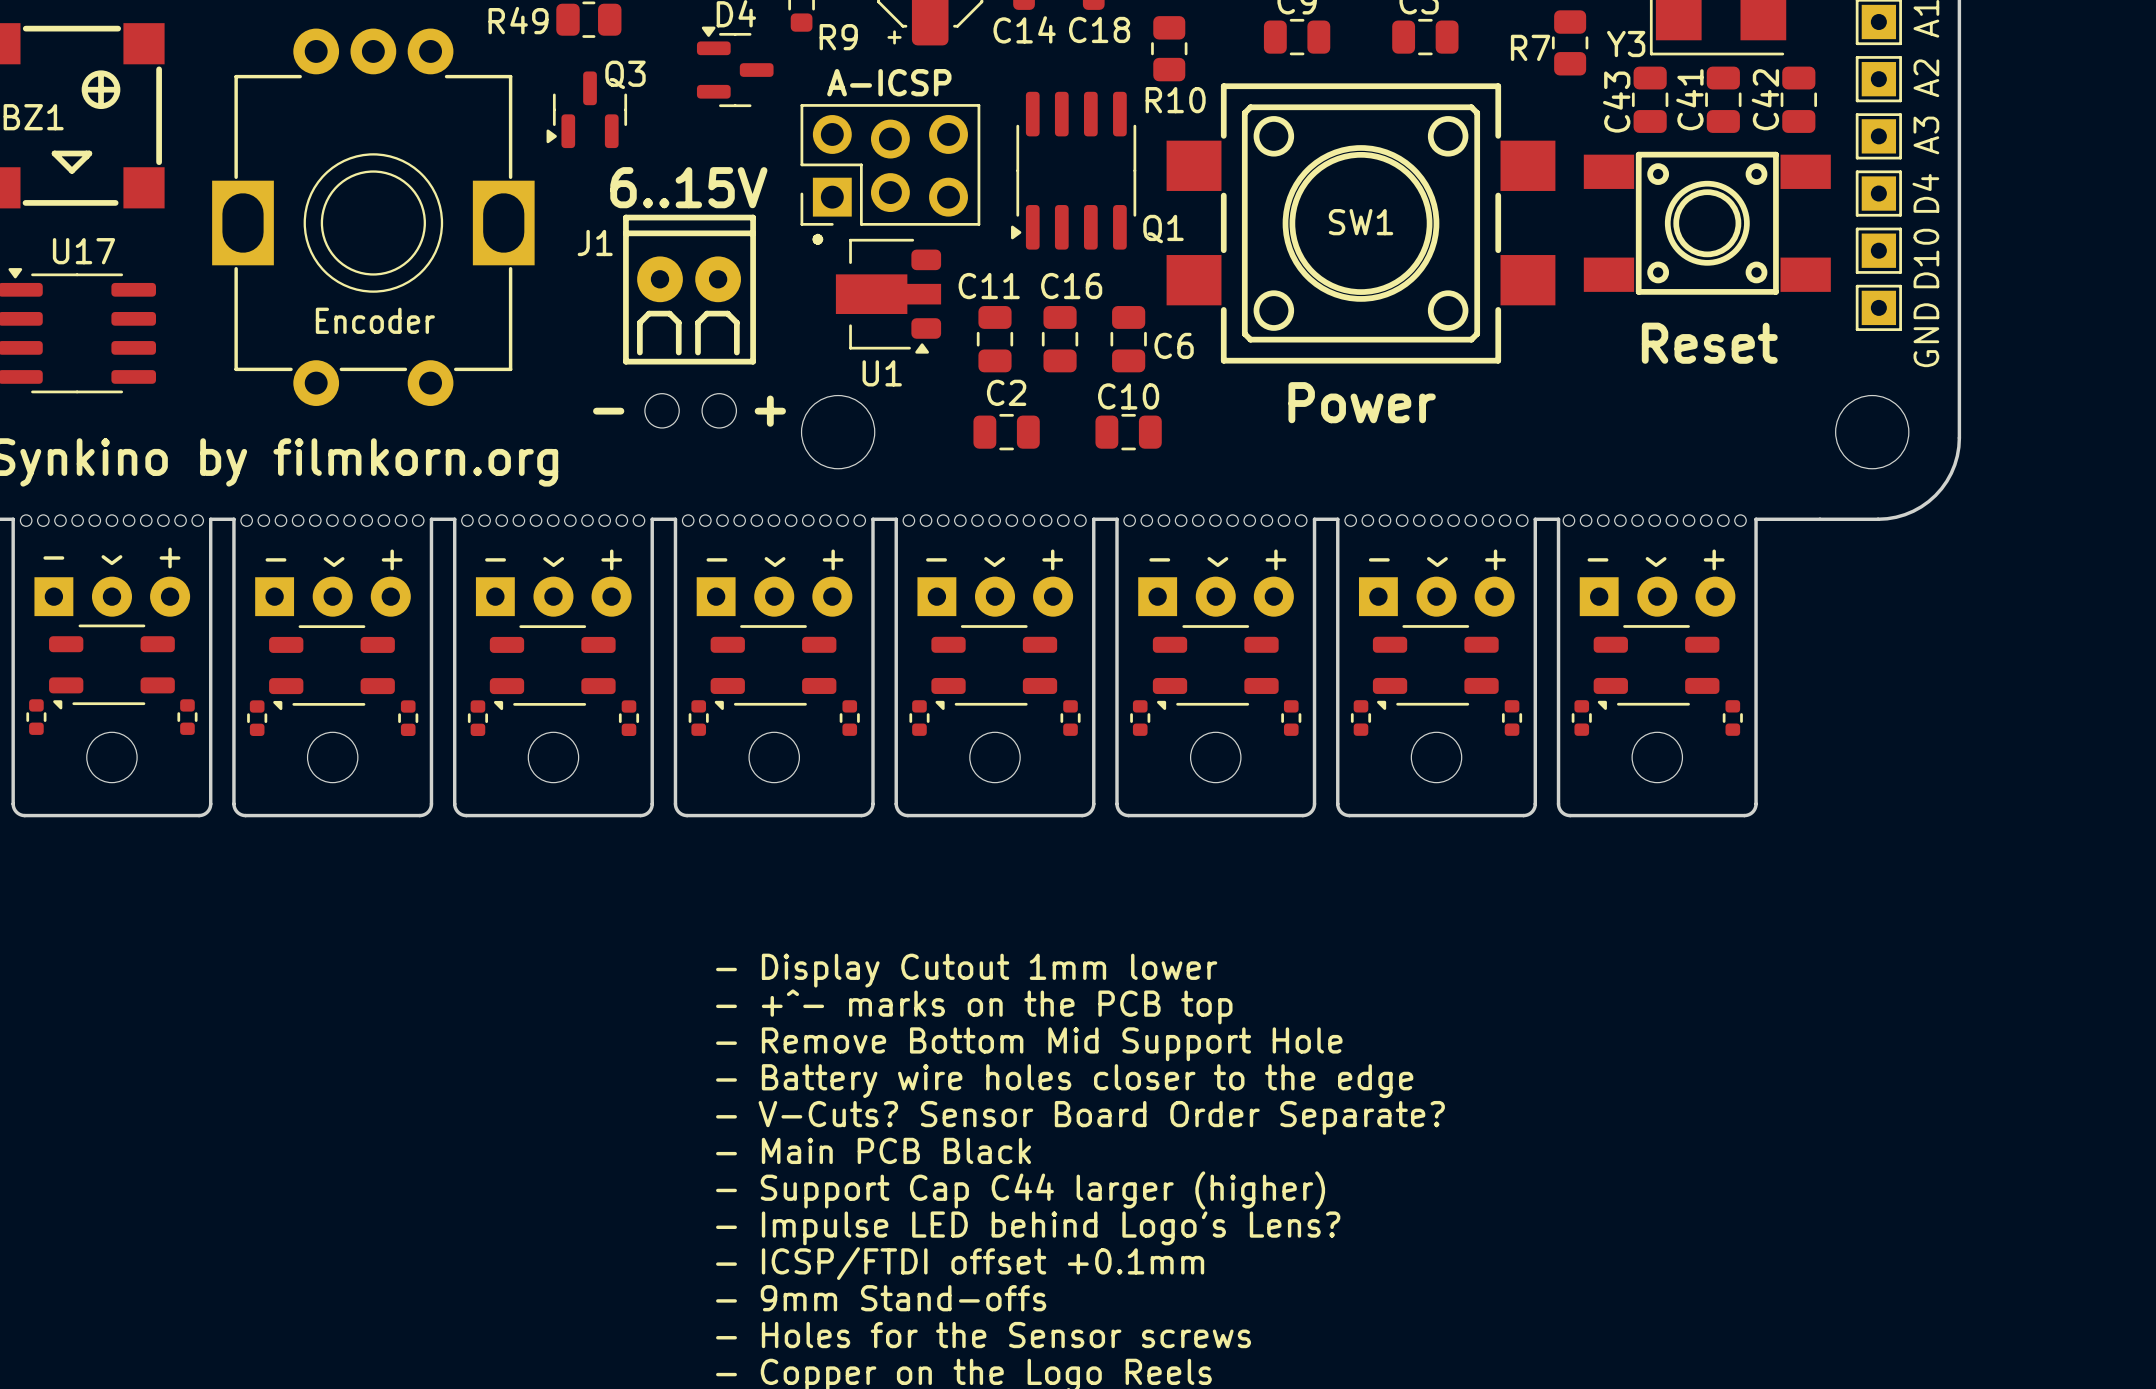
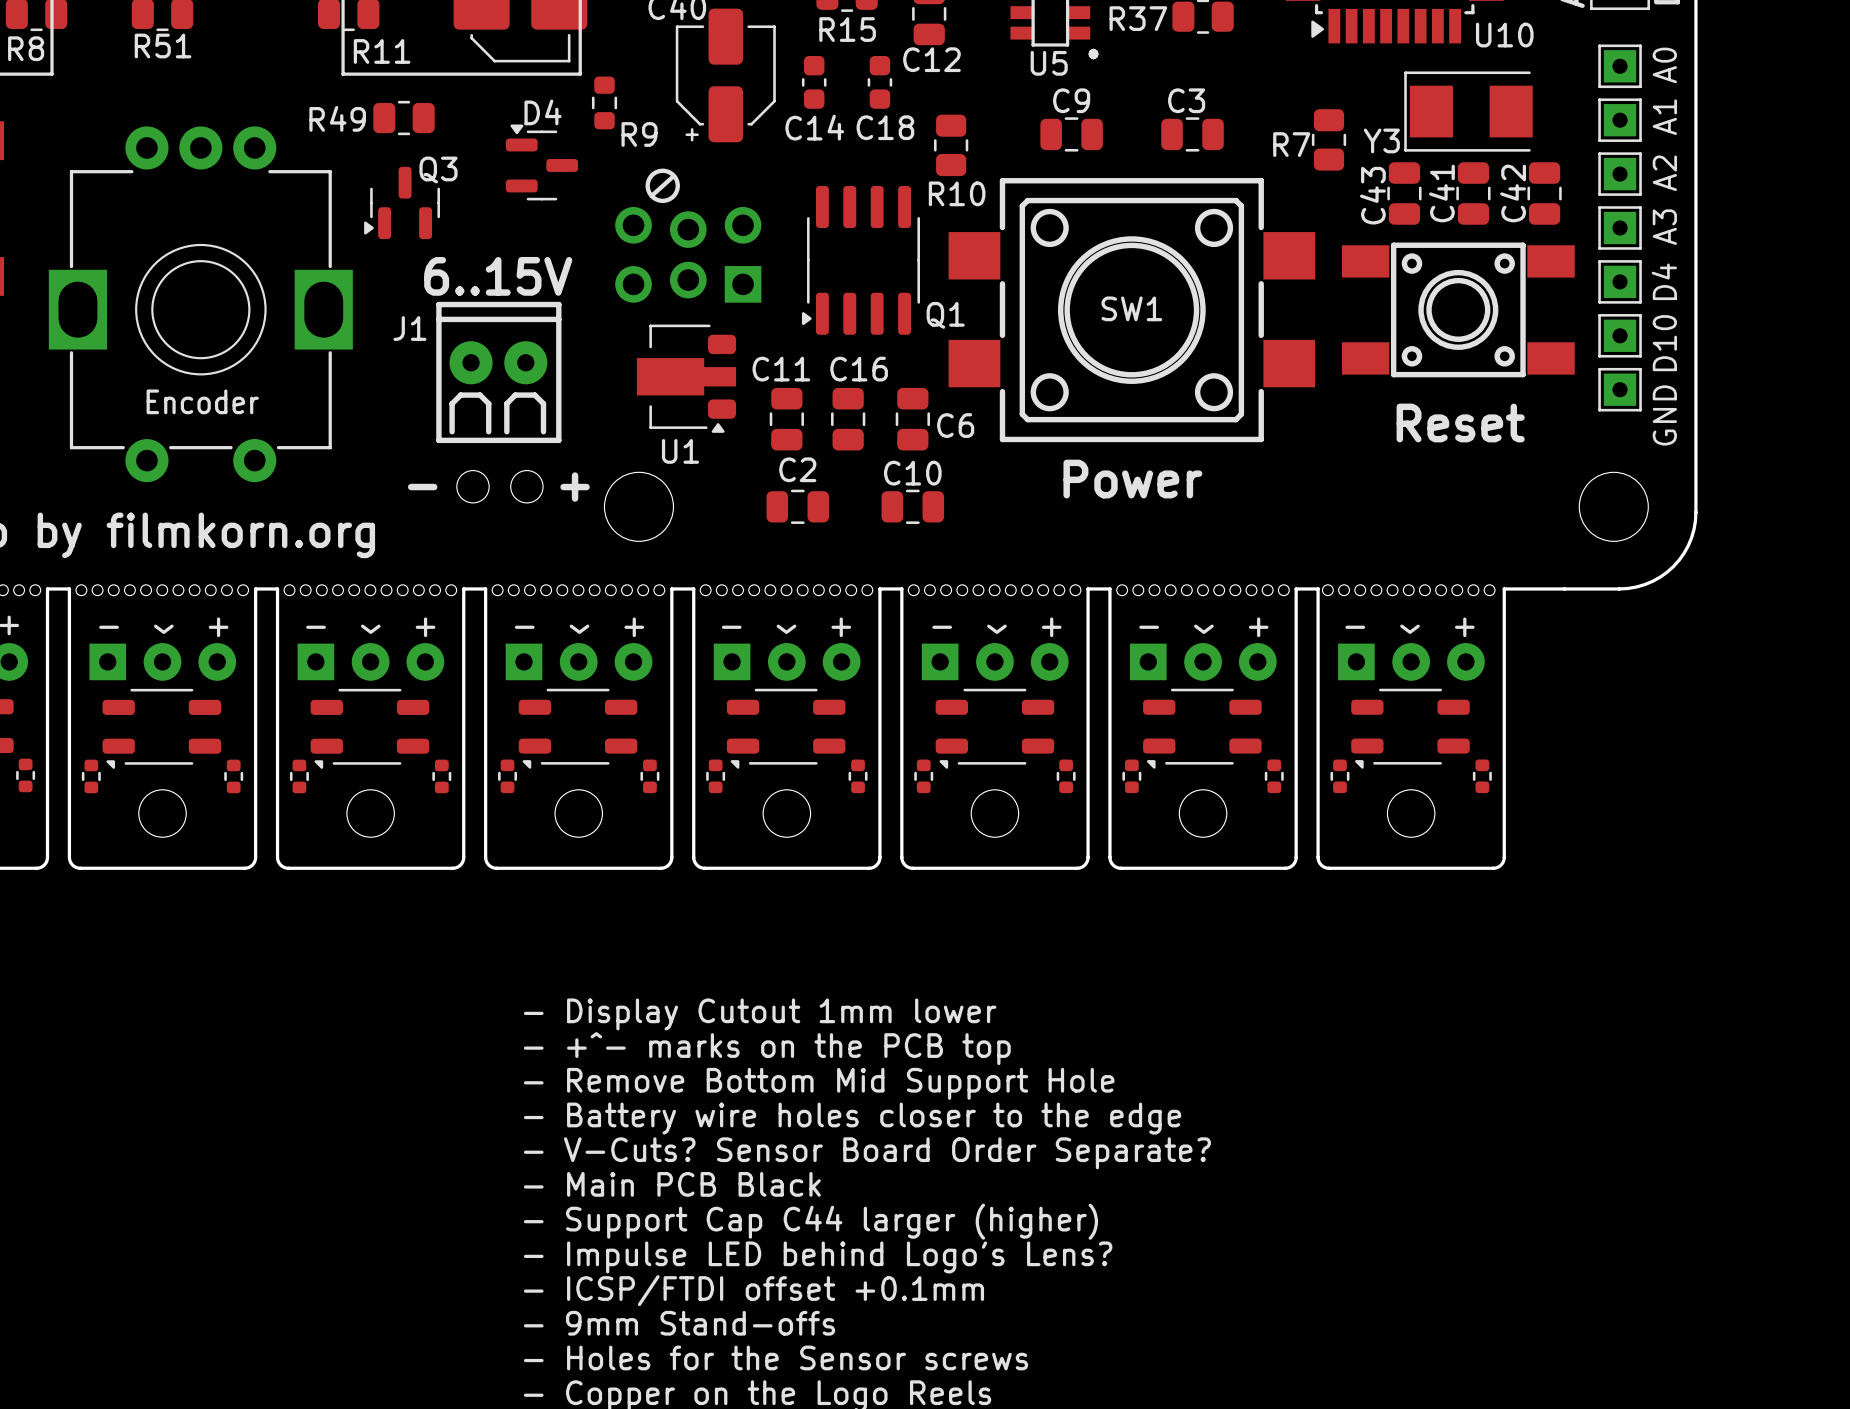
drawing: none -> [645, 168, 680, 204]
line: none -> (673, 176) (651, 195)
text: A-ICSP (889, 82) -> none
part side: top (890, 164) -> bottom (688, 254)
text: • (817, 239) -> none

